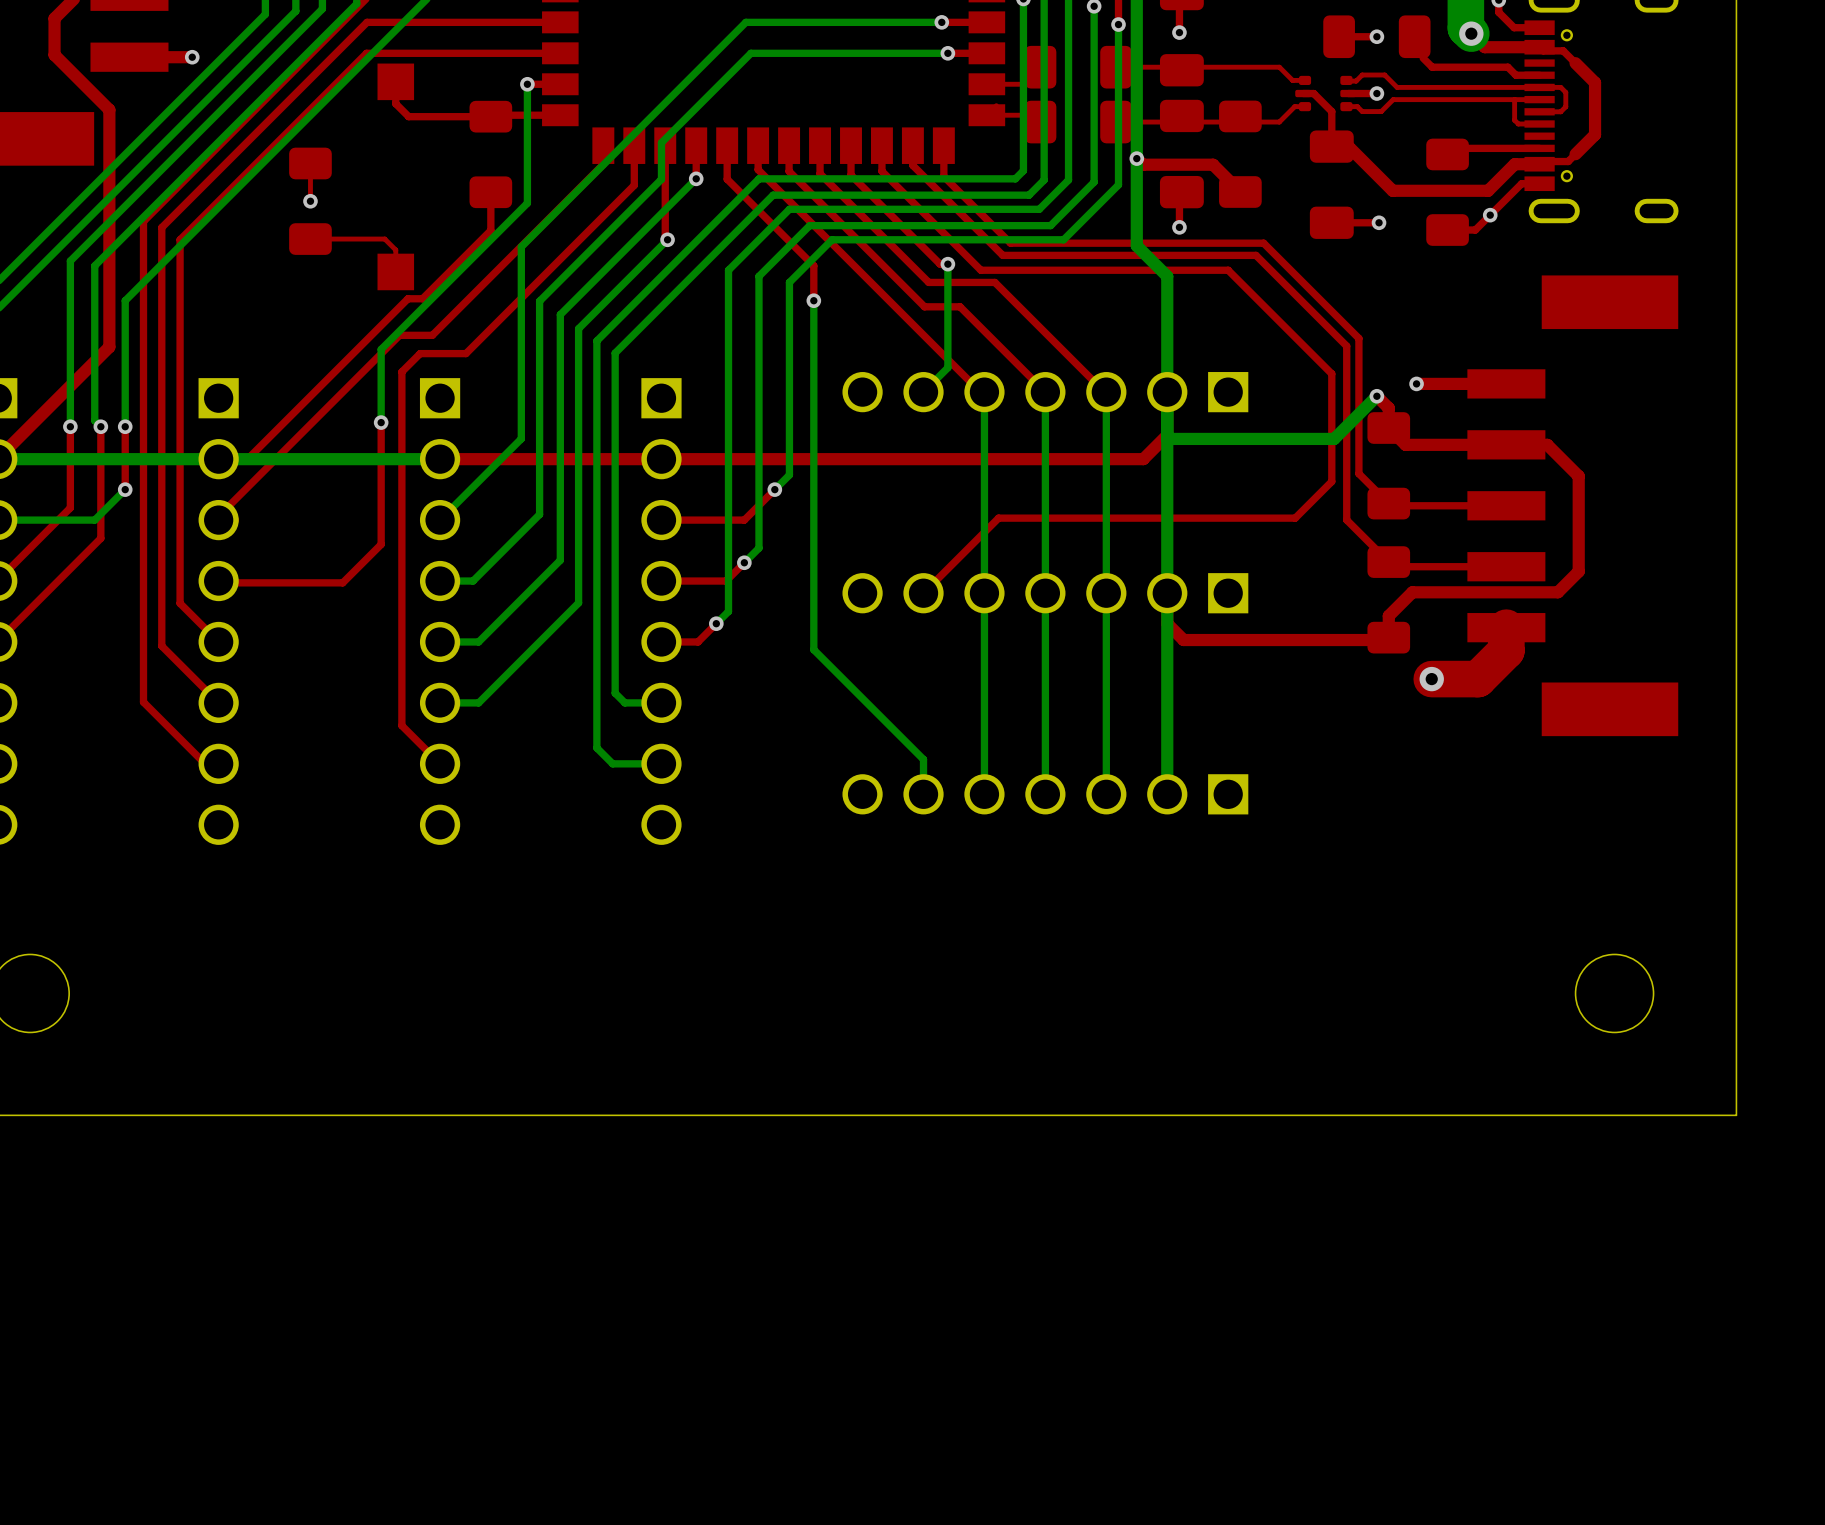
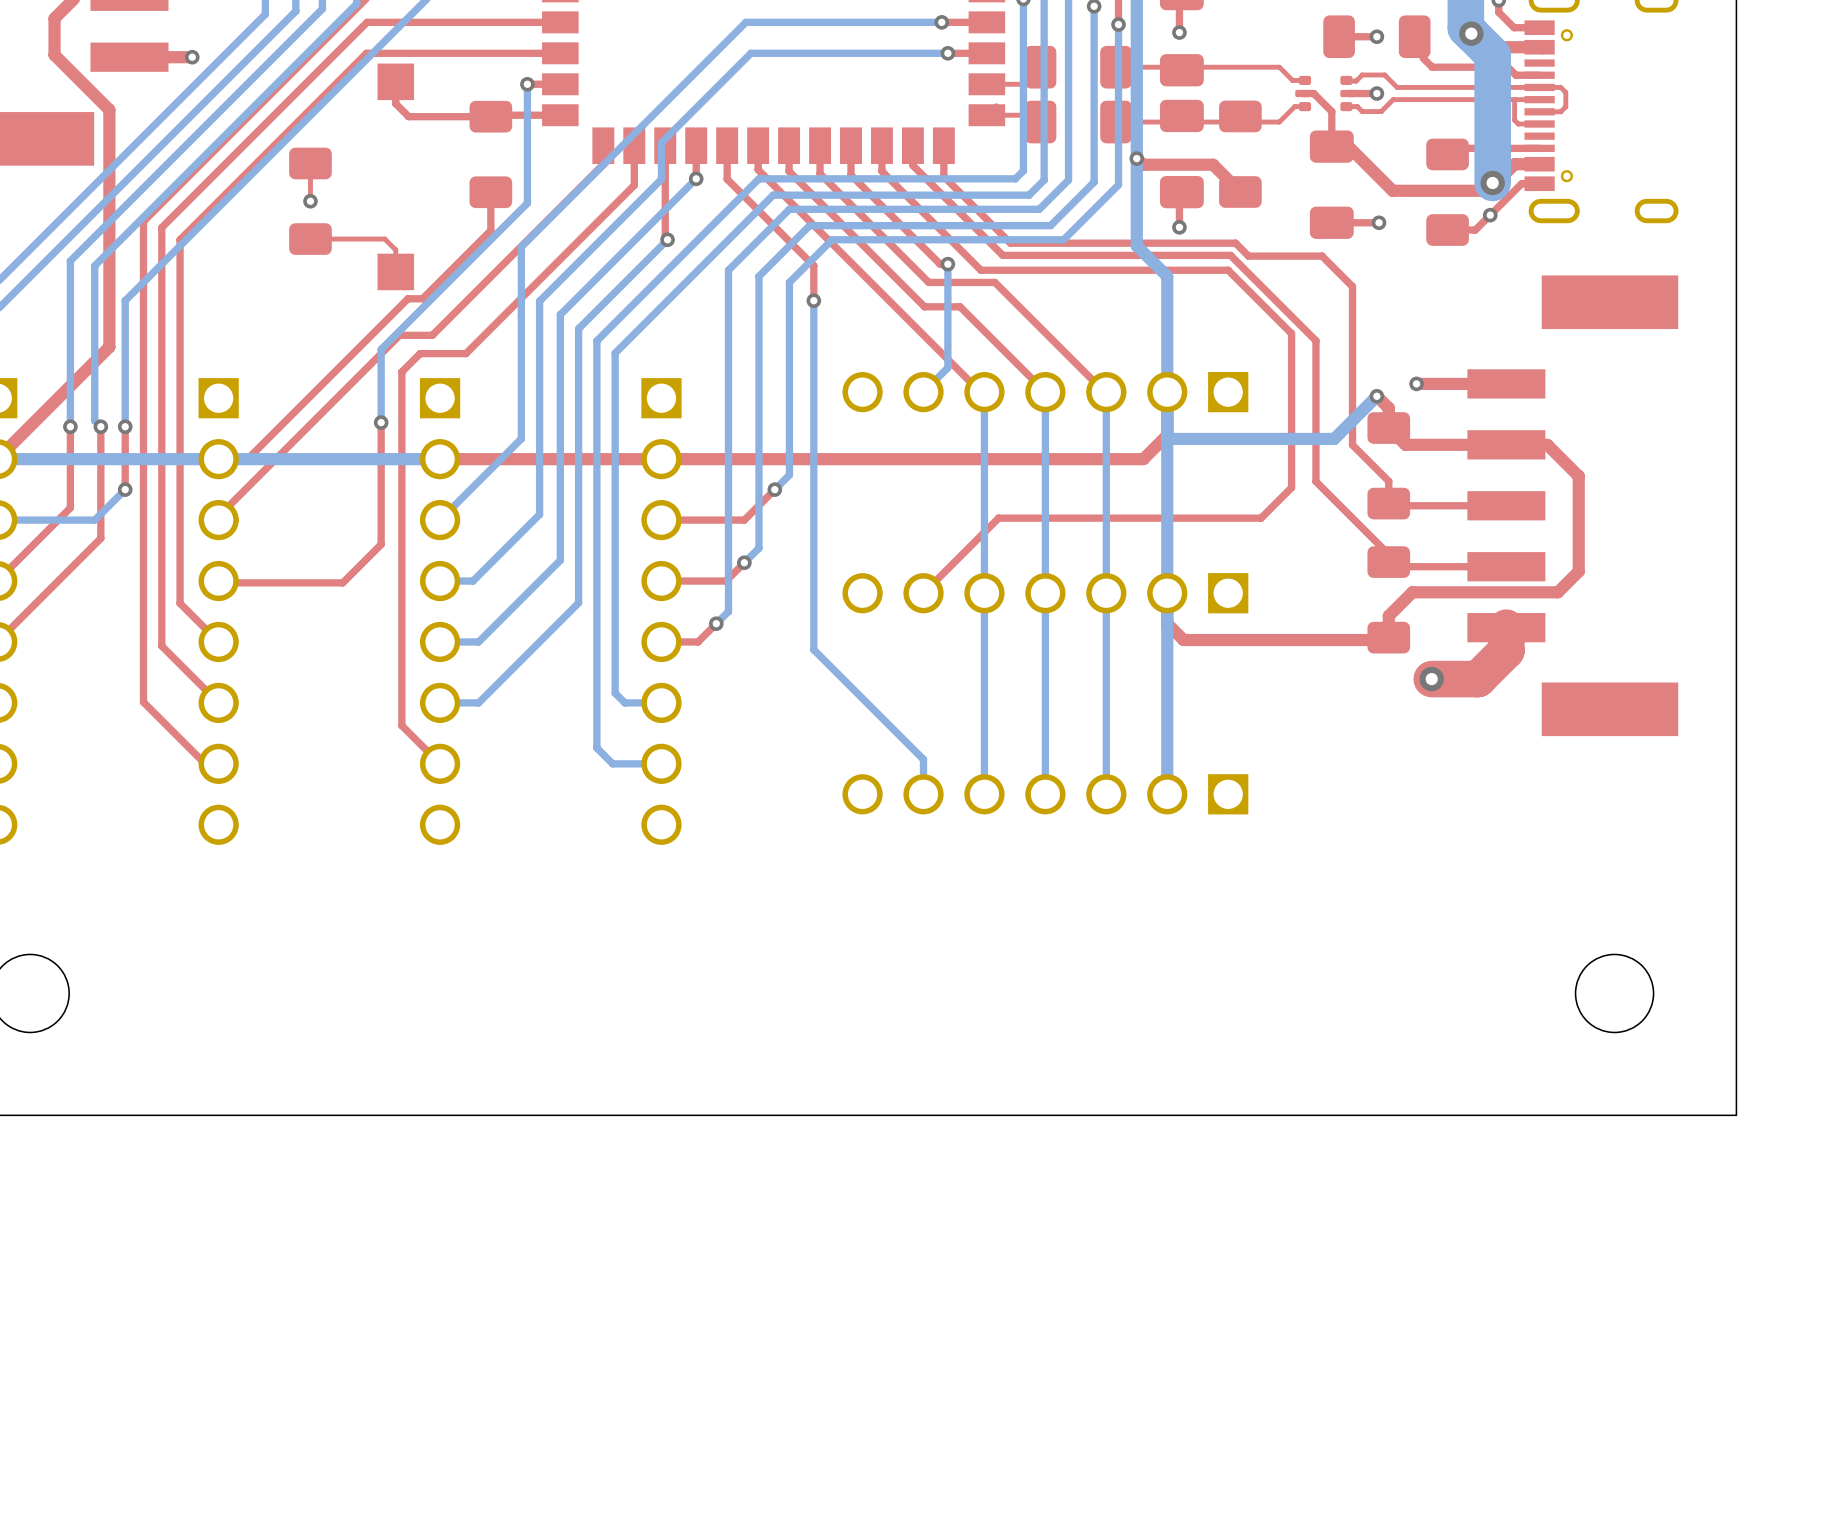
bottom track: none -> (1471, 33) (1492, 55) (1492, 182)
top track: (1543, 50) (1563, 50) (1595, 82) (1595, 134) (1568, 161) (1542, 161) -> none
via: none -> (1492, 182)
top track: (1235, 243) (1263, 243) (1358, 338) (1358, 473) (1388, 503) -> (1235, 243) (1248, 256) (1322, 256) (1352, 286) (1352, 445) (1388, 481) (1388, 503)
top track: (1230, 255) (1255, 255) (1346, 346) (1346, 520) (1388, 562) -> (1230, 255) (1315, 340) (1315, 481) (1388, 554) (1388, 562)
top track: (1291, 333) (1331, 373) (1331, 481) (1295, 518) (1261, 518) -> (1291, 333) (1291, 487) (1261, 518)

